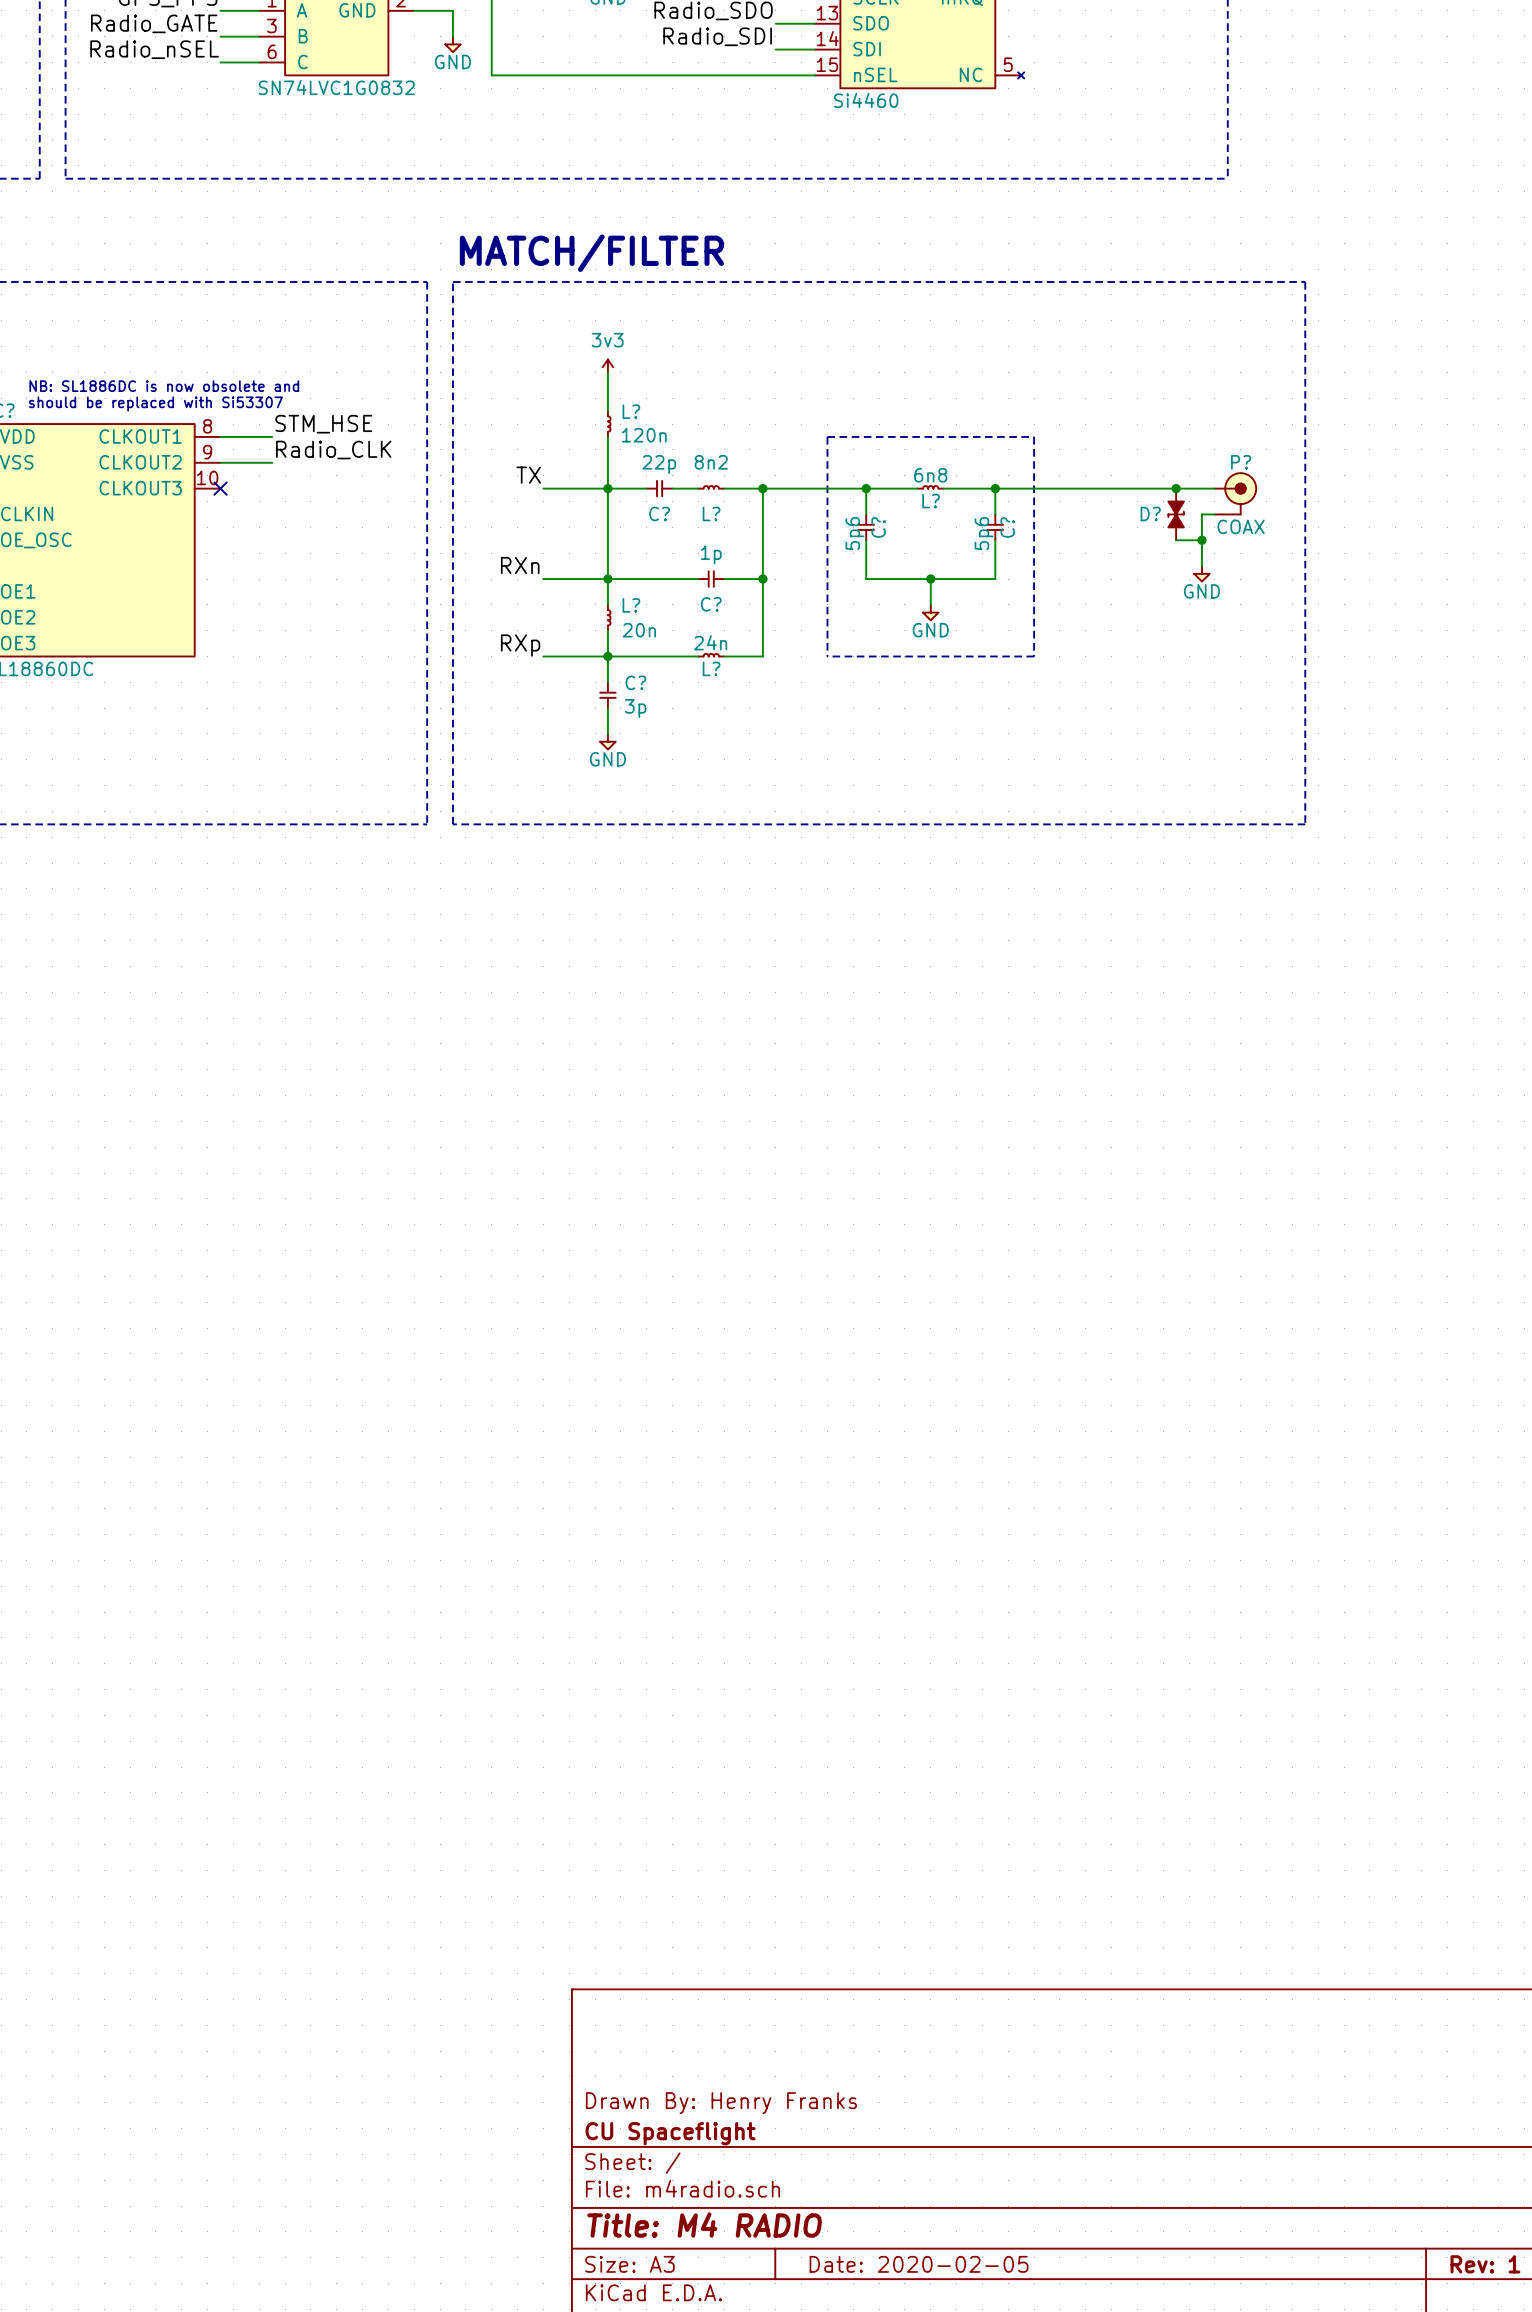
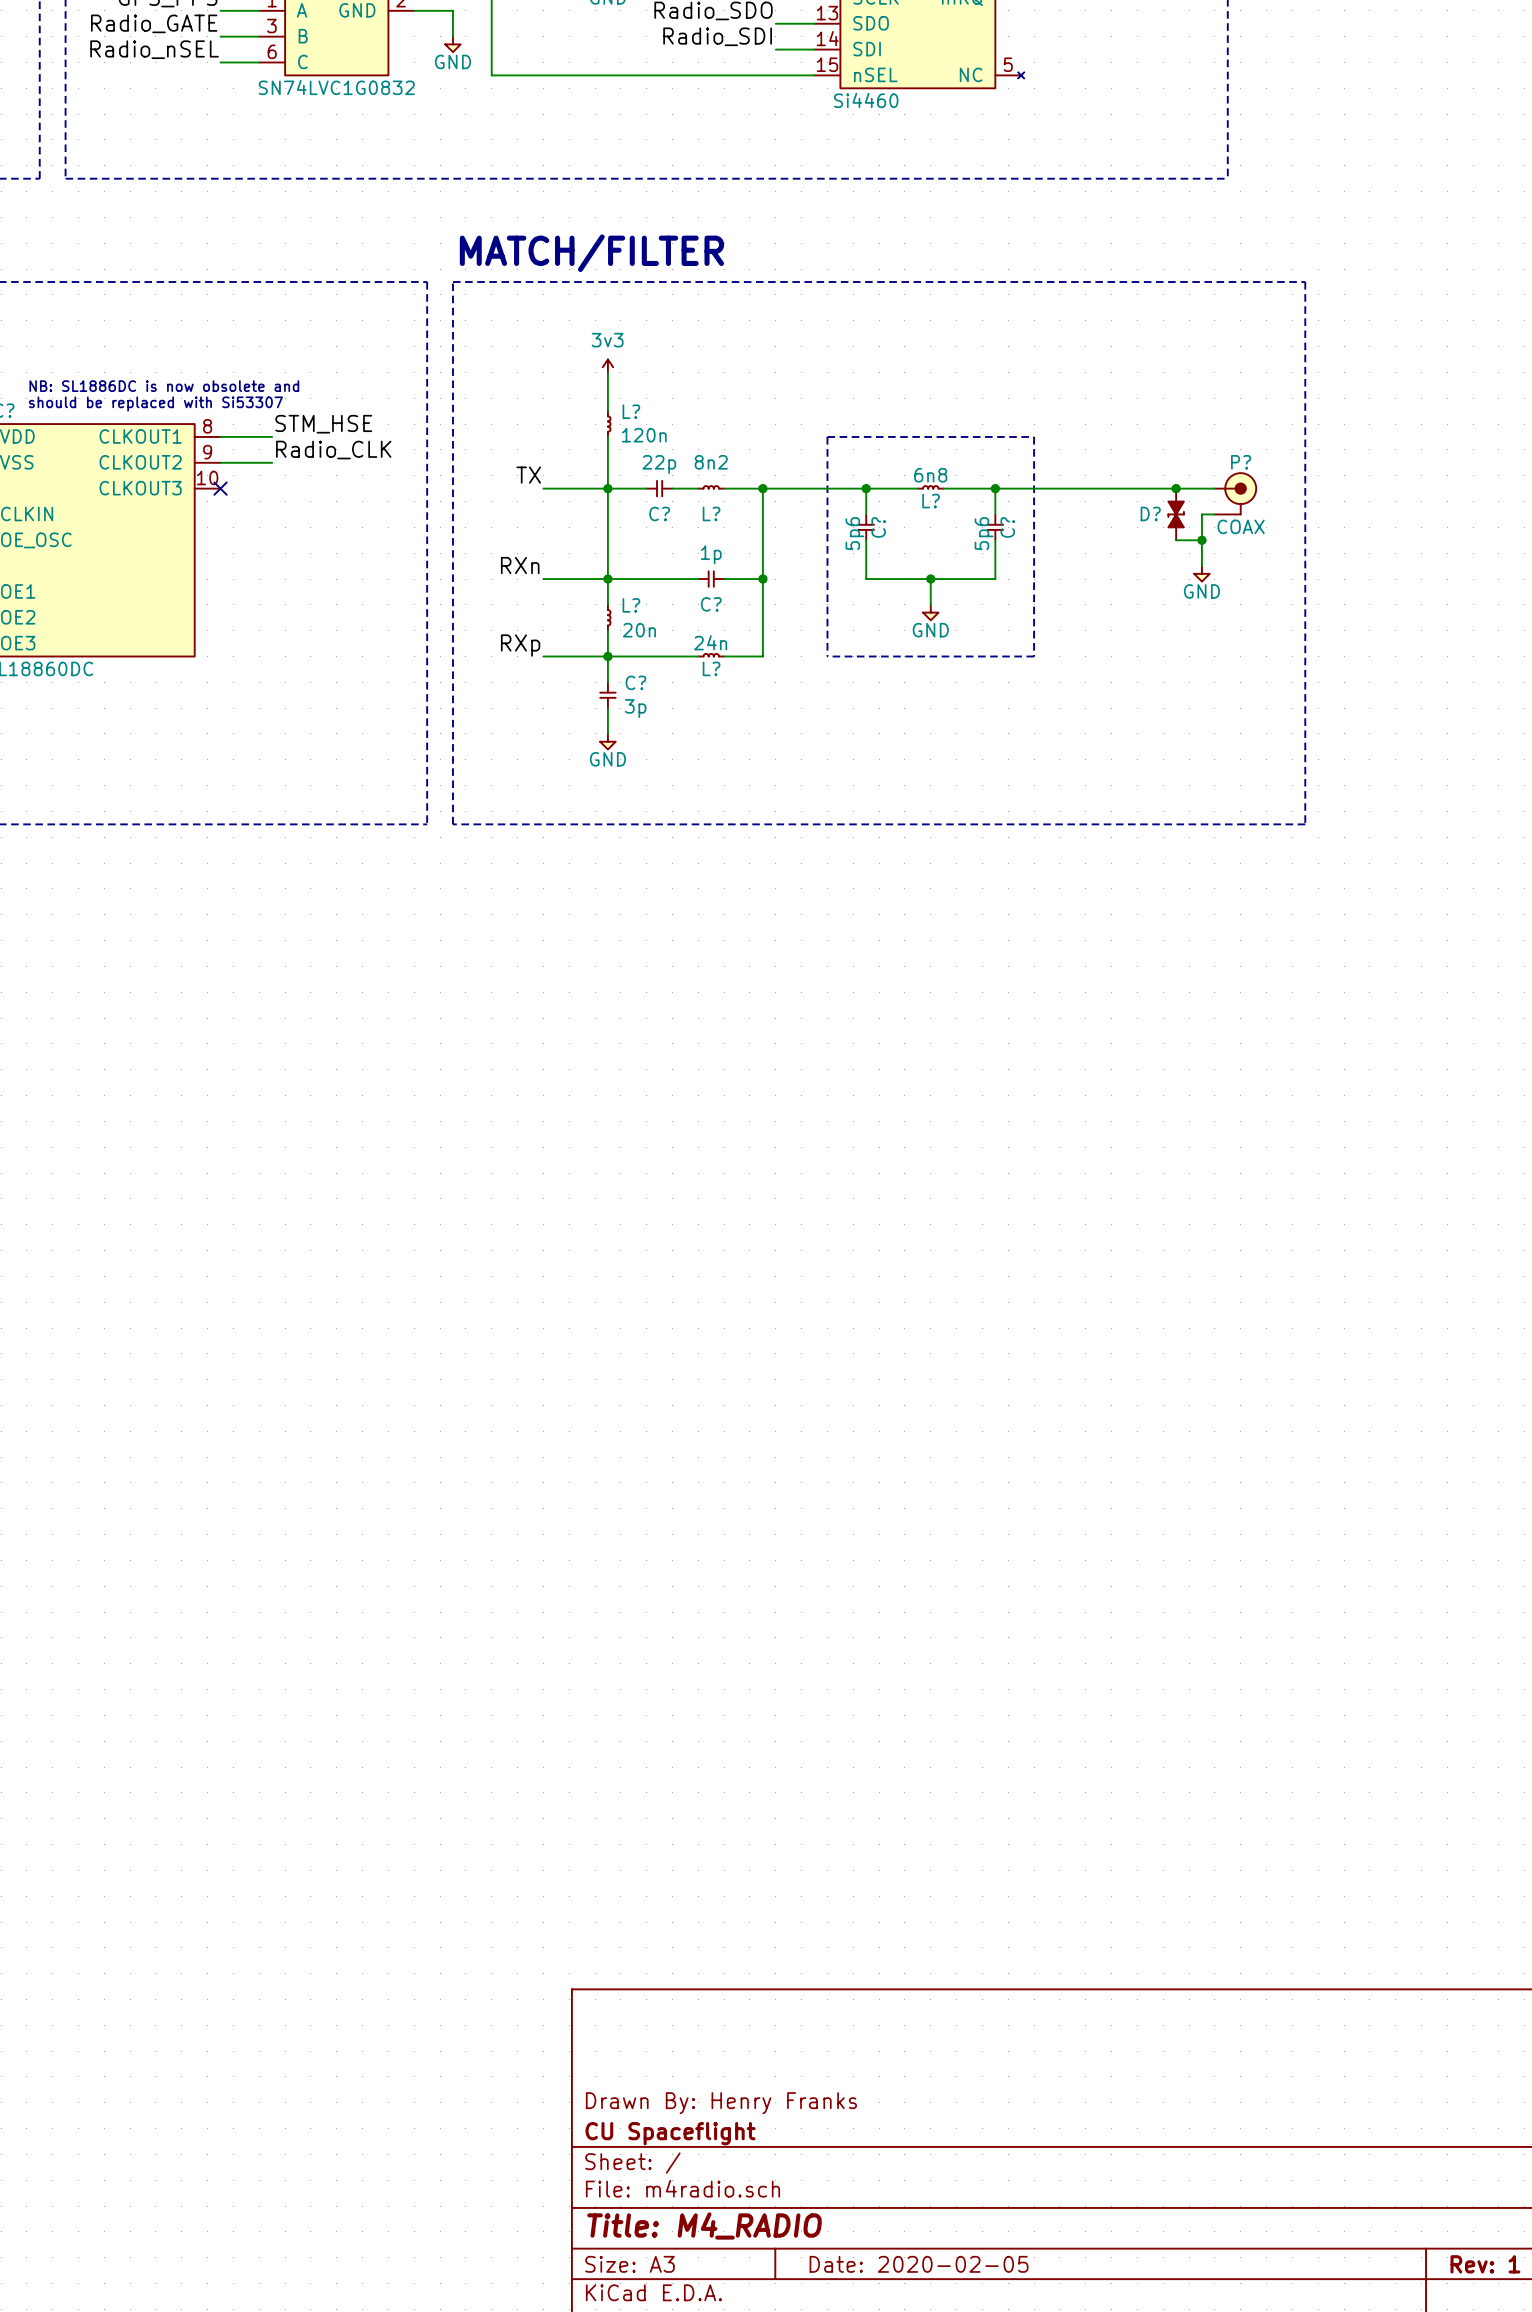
title block: Title: M4 RADIO (704, 2225) -> Title: M4_RADIO (704, 2225)

